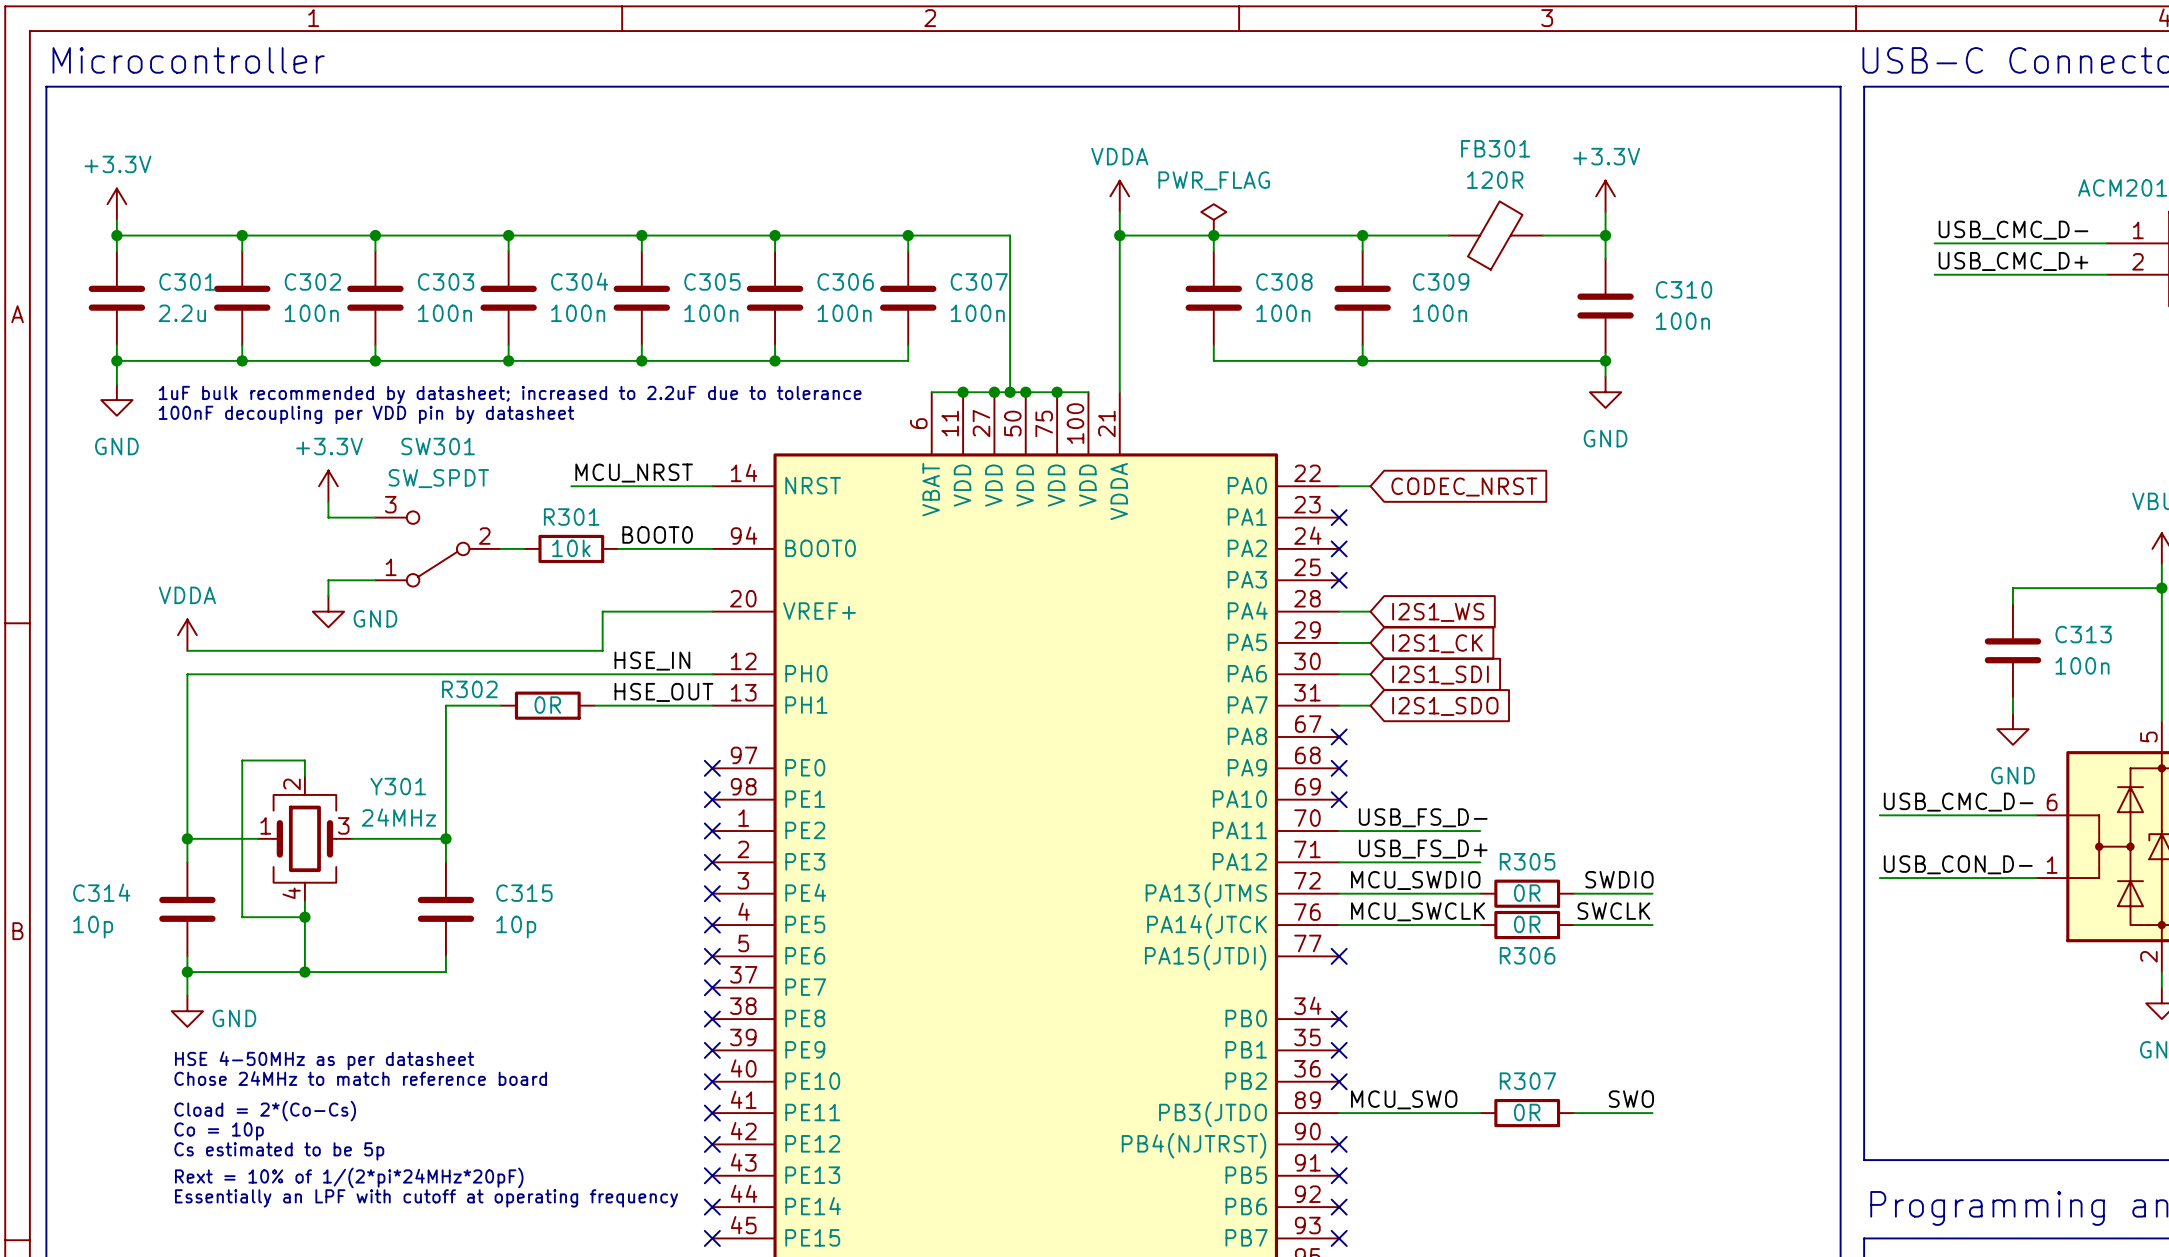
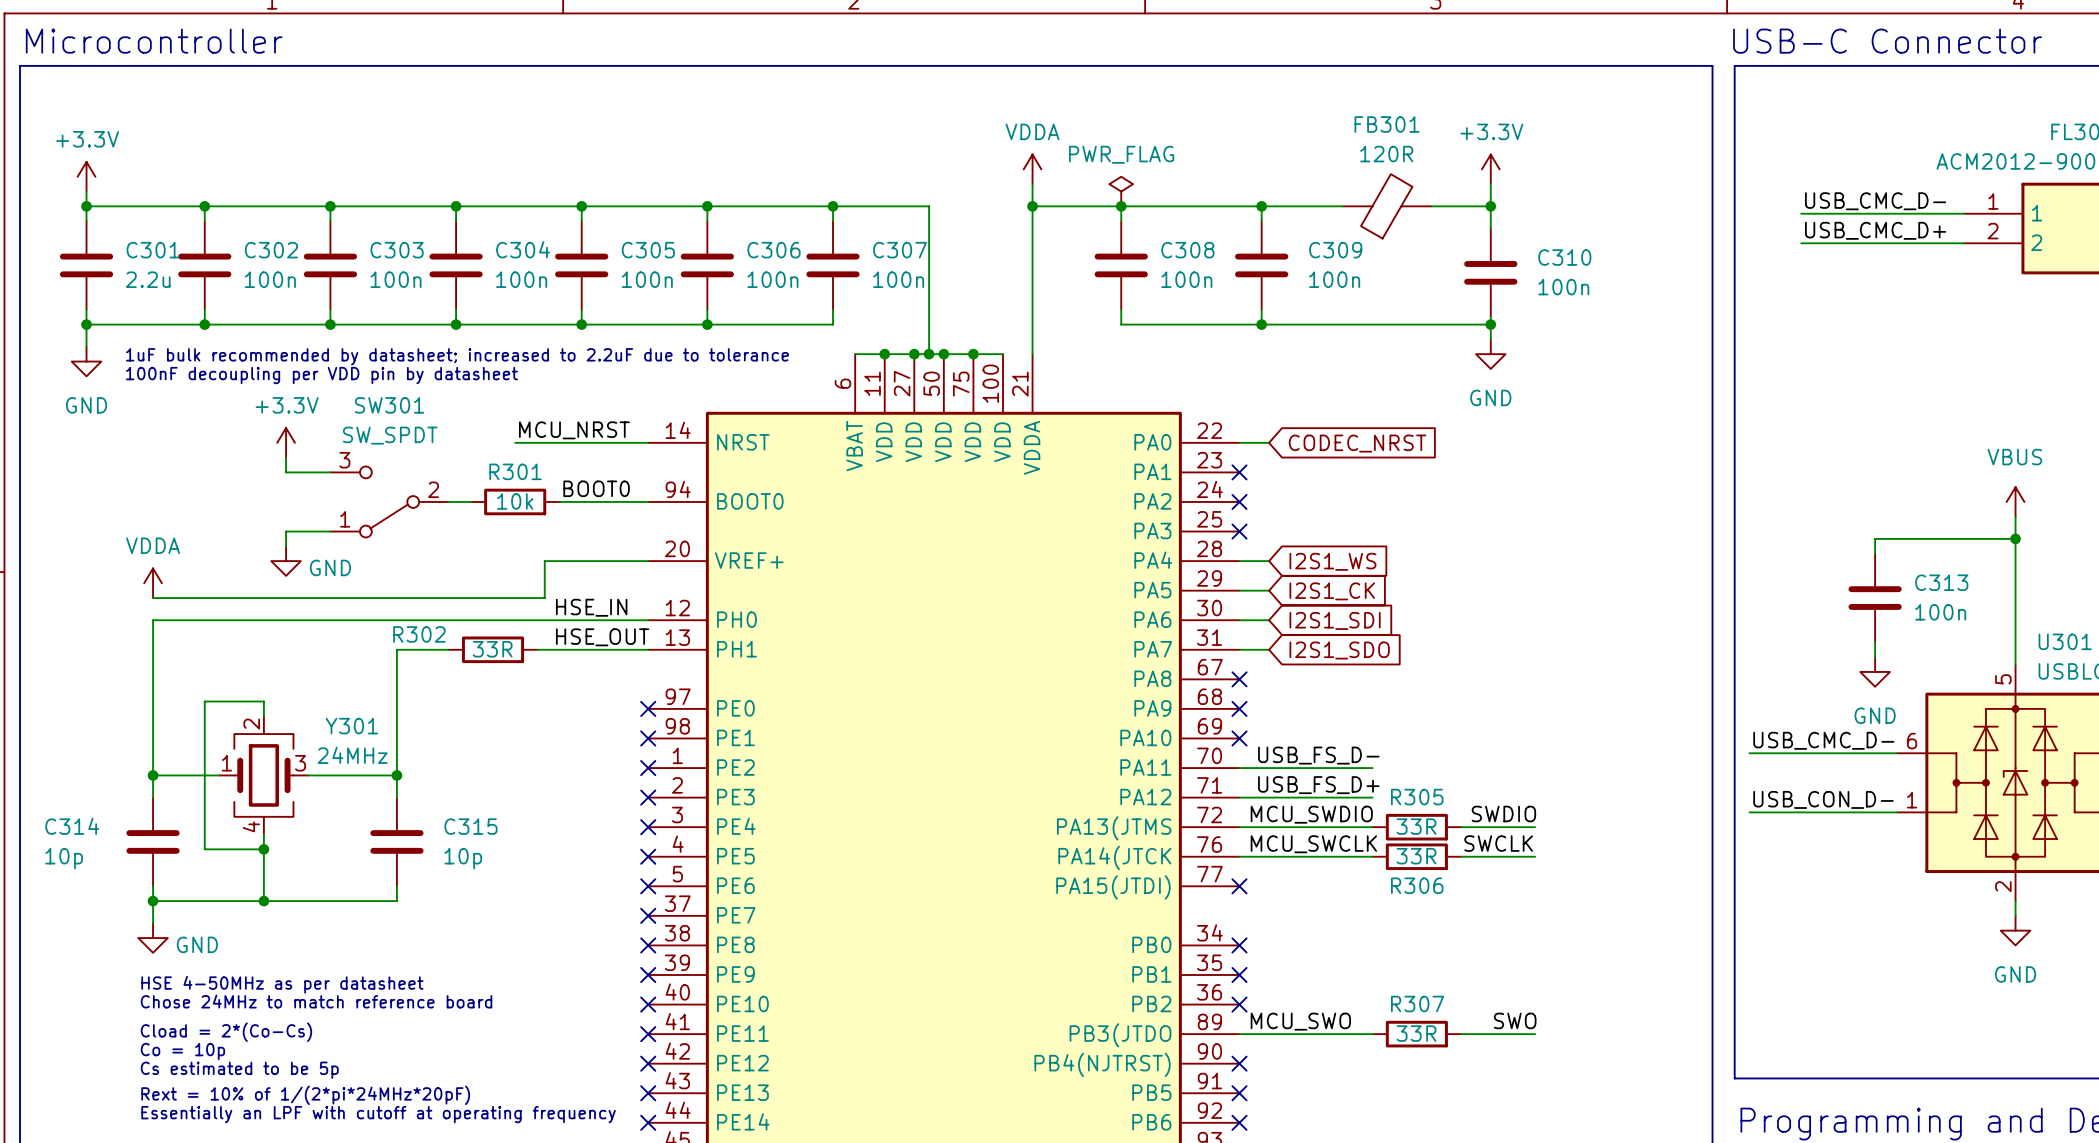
R302 value: 0R (547, 705) -> 33R (492, 649)
R305 value: 0R (1527, 893) -> 33R (1416, 826)
R306 value: 0R (1527, 924) -> 33R (1416, 856)
R307 value: 0R (1527, 1112) -> 33R (1416, 1033)

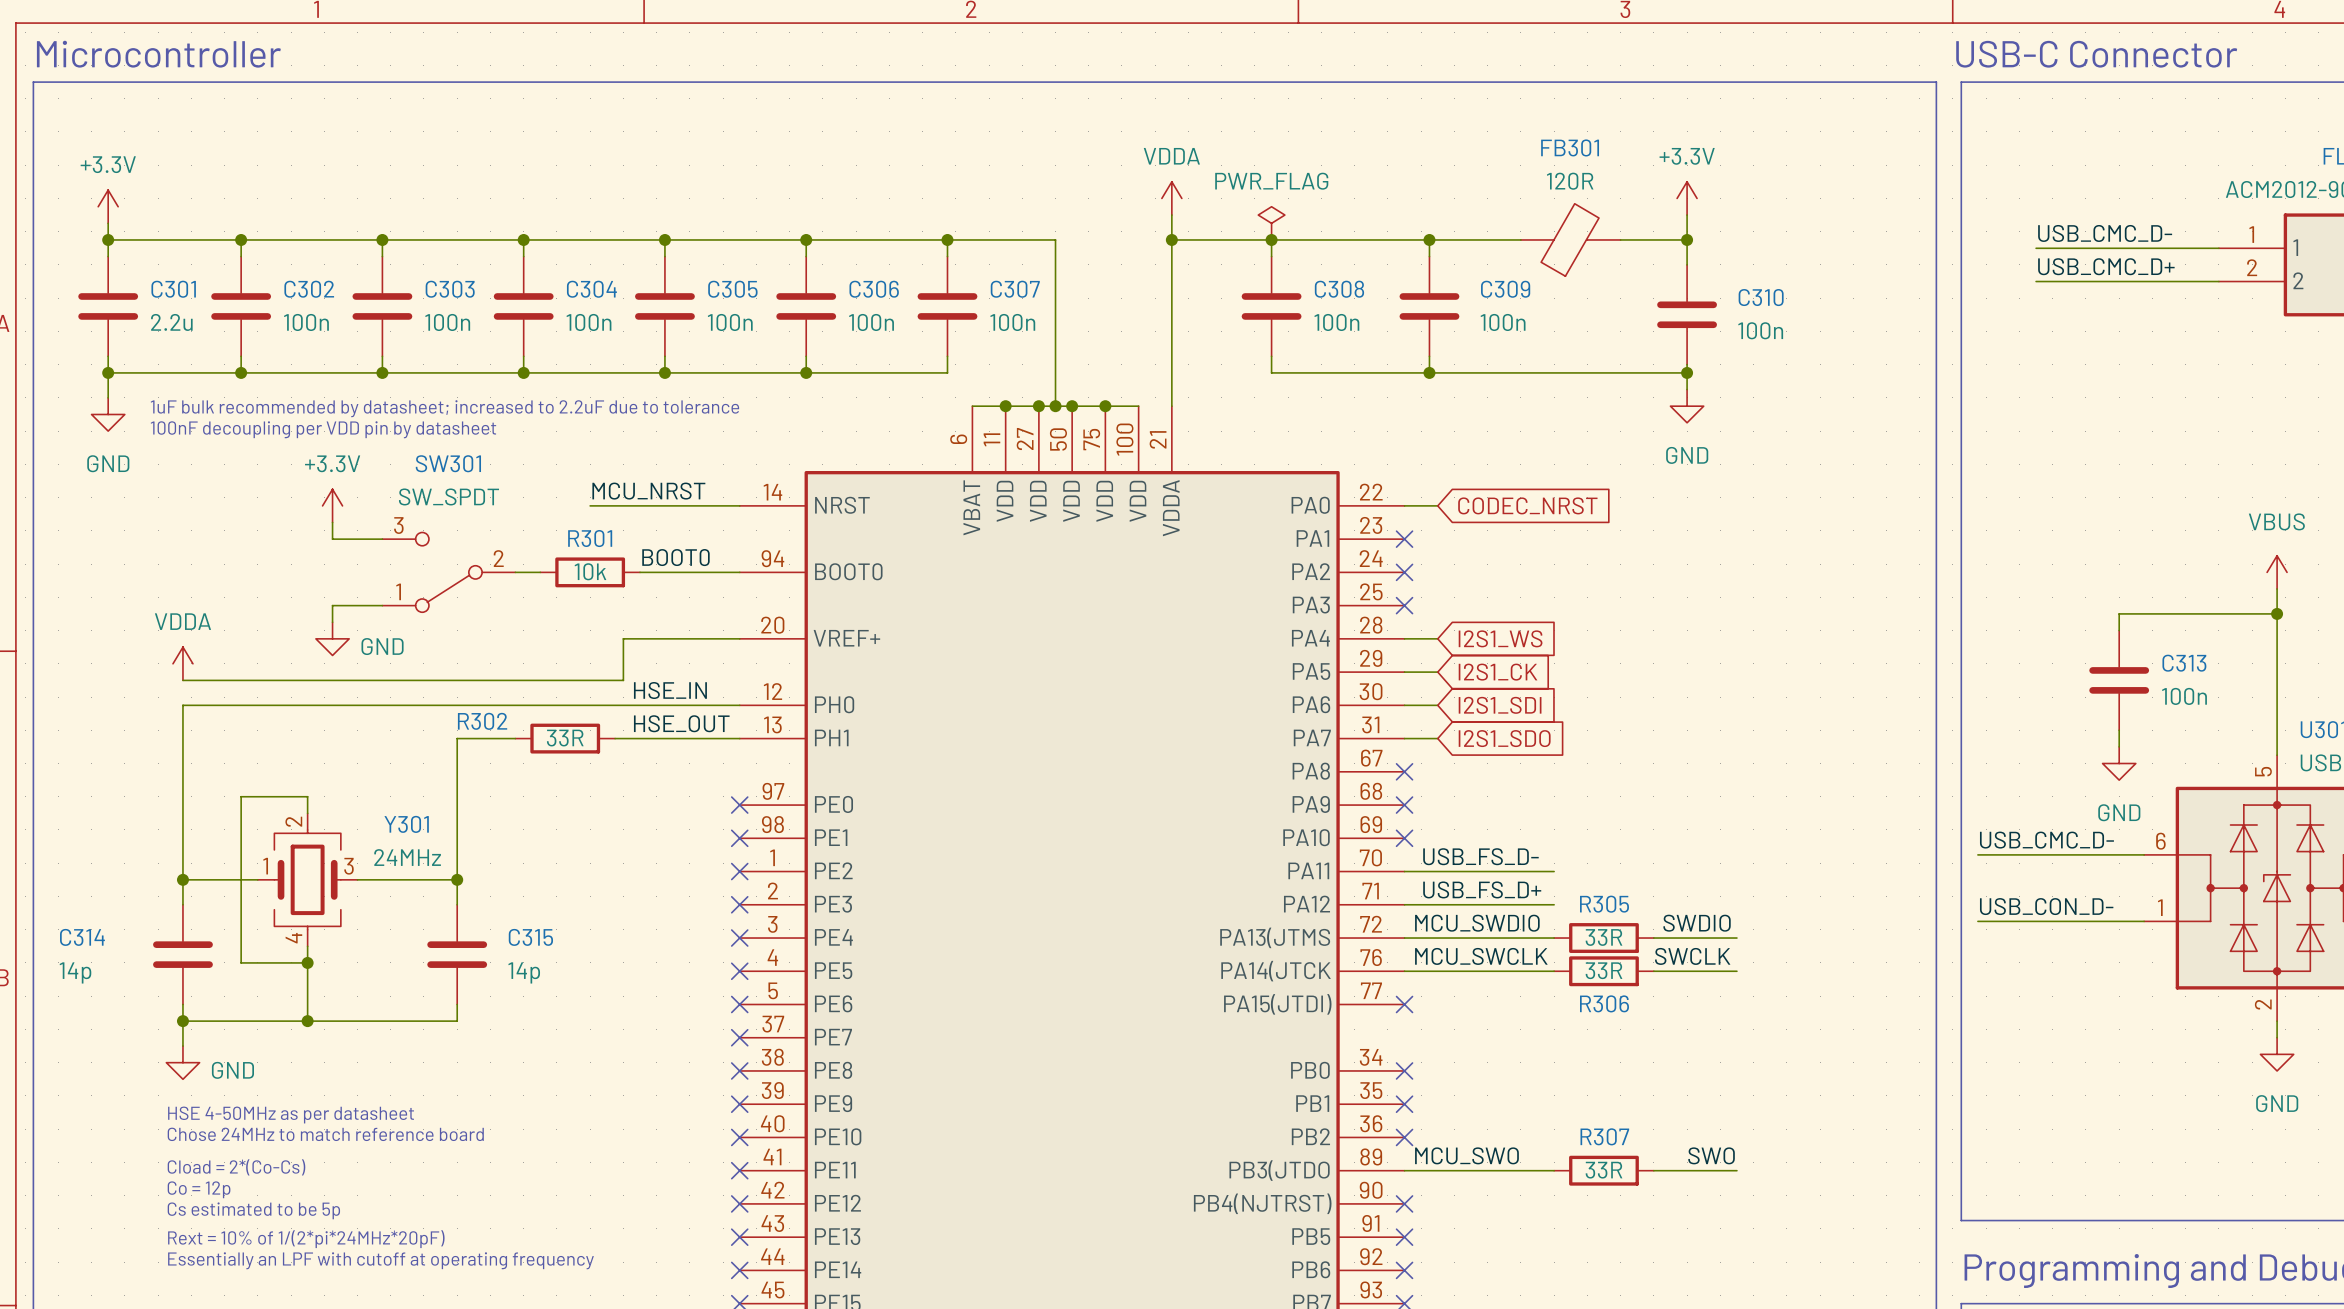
C314 value: 10p (64, 858) -> 14p (75, 972)
C315 value: 10p (463, 858) -> 14p (524, 972)
text: Co = 10p (182, 1051) -> Co = 12p (199, 1189)

